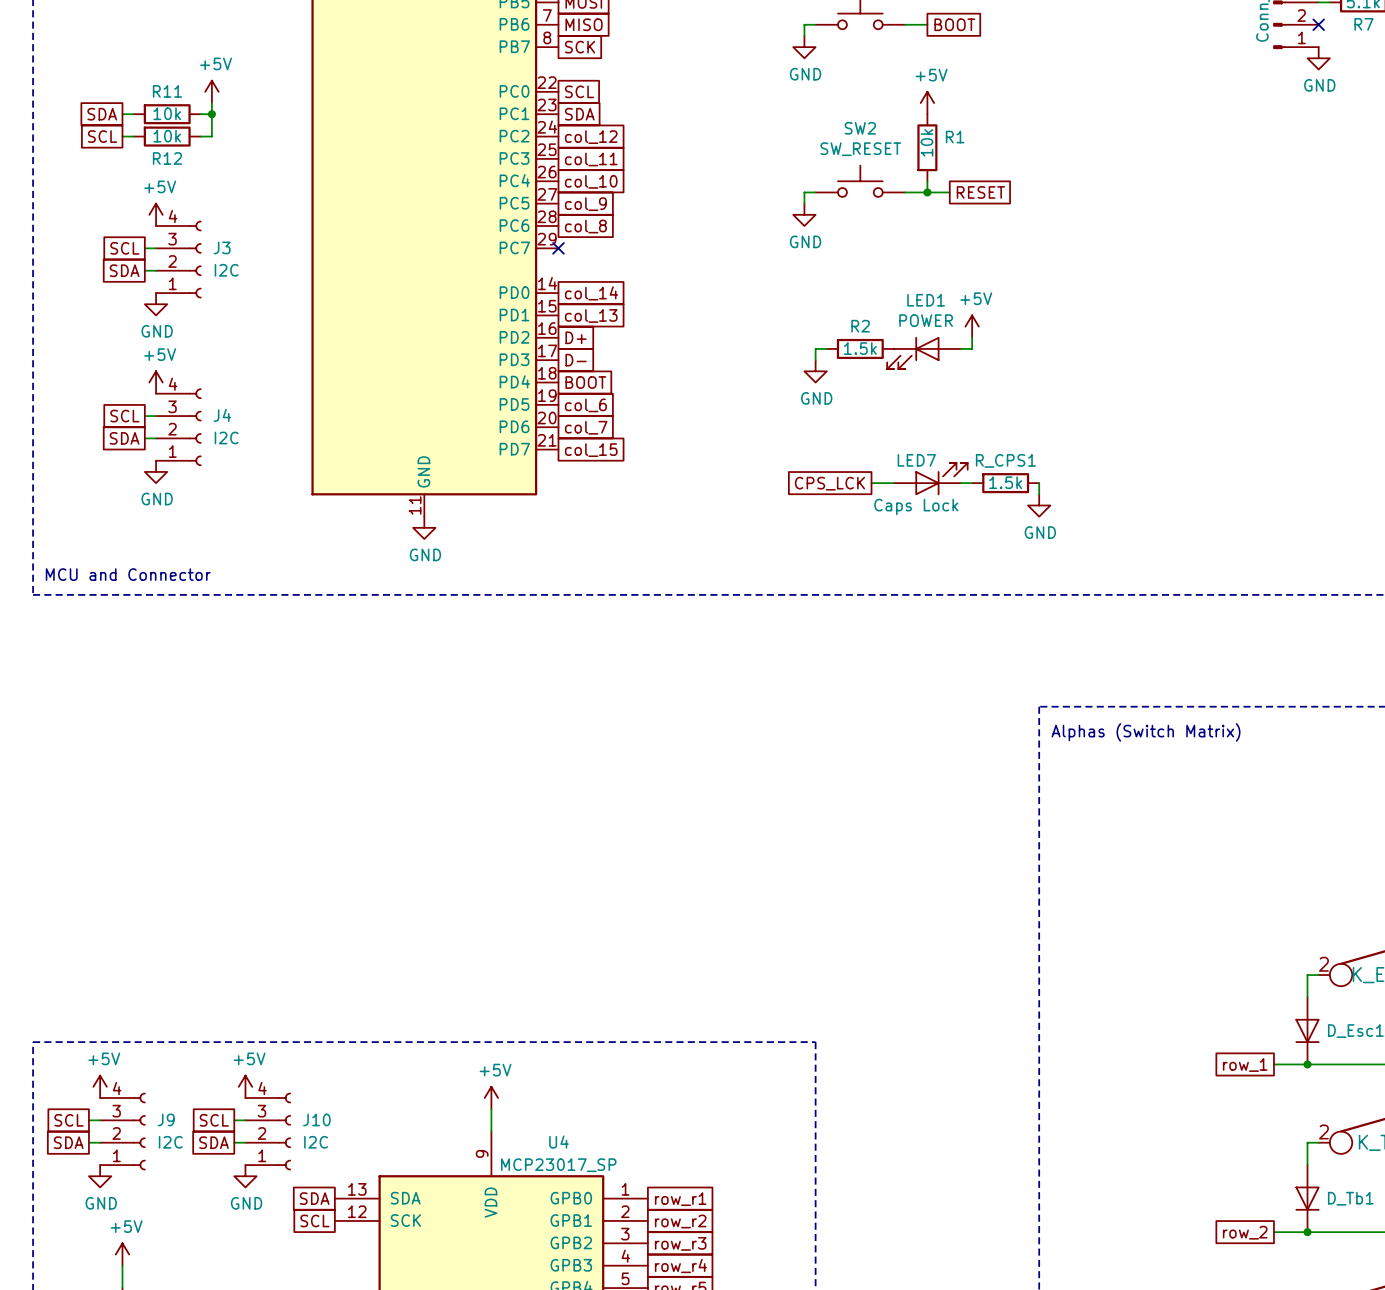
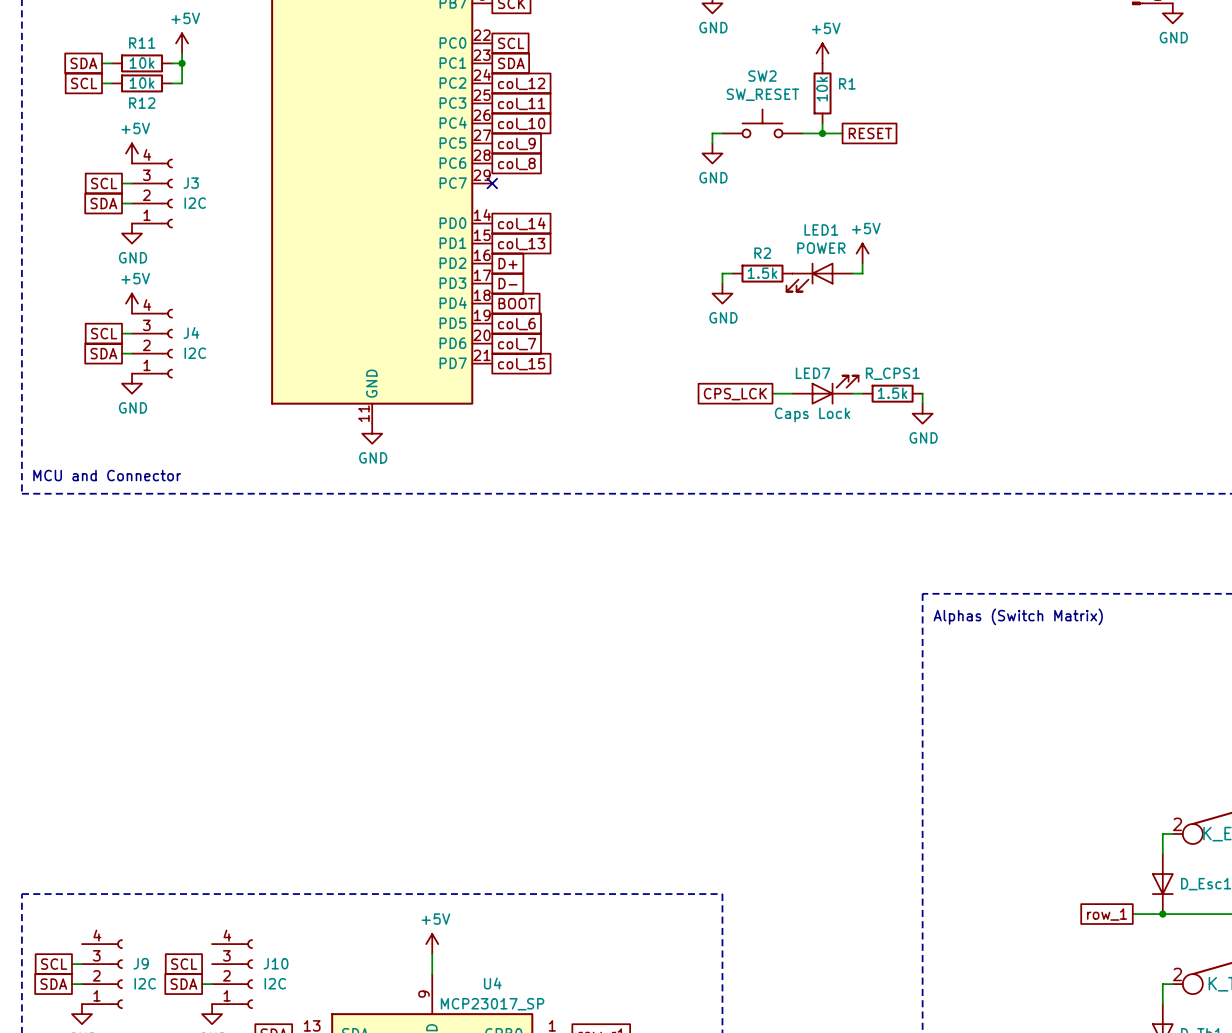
power symbol: +5V (100, 1086) -> none
power symbol: +5V (245, 1086) -> none
wire: (234, 1120) (245, 1120) -> none

